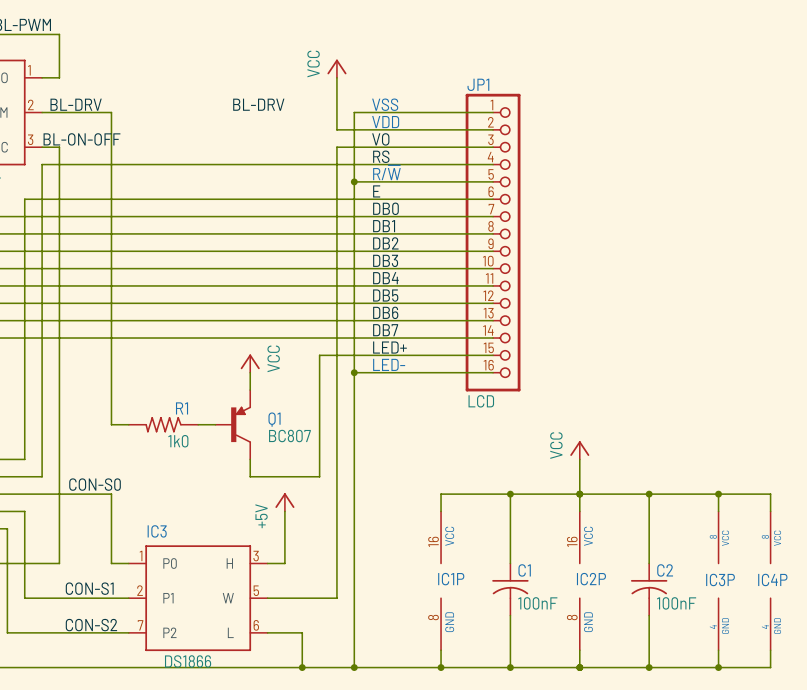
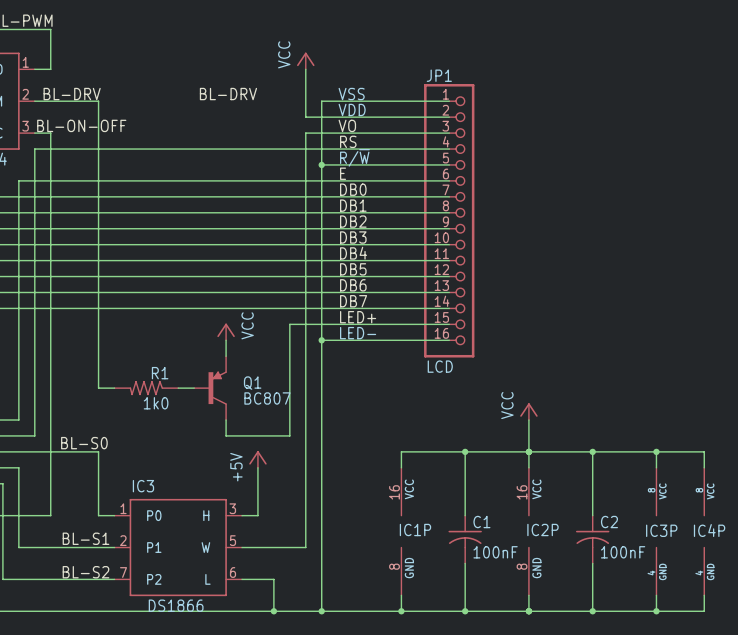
label: CON-S0 (95, 484) -> BL-S0 (84, 443)
label: CON-S1 (89, 588) -> BL-S1 (85, 538)
label: CON-S2 (91, 625) -> BL-S2 (85, 572)

